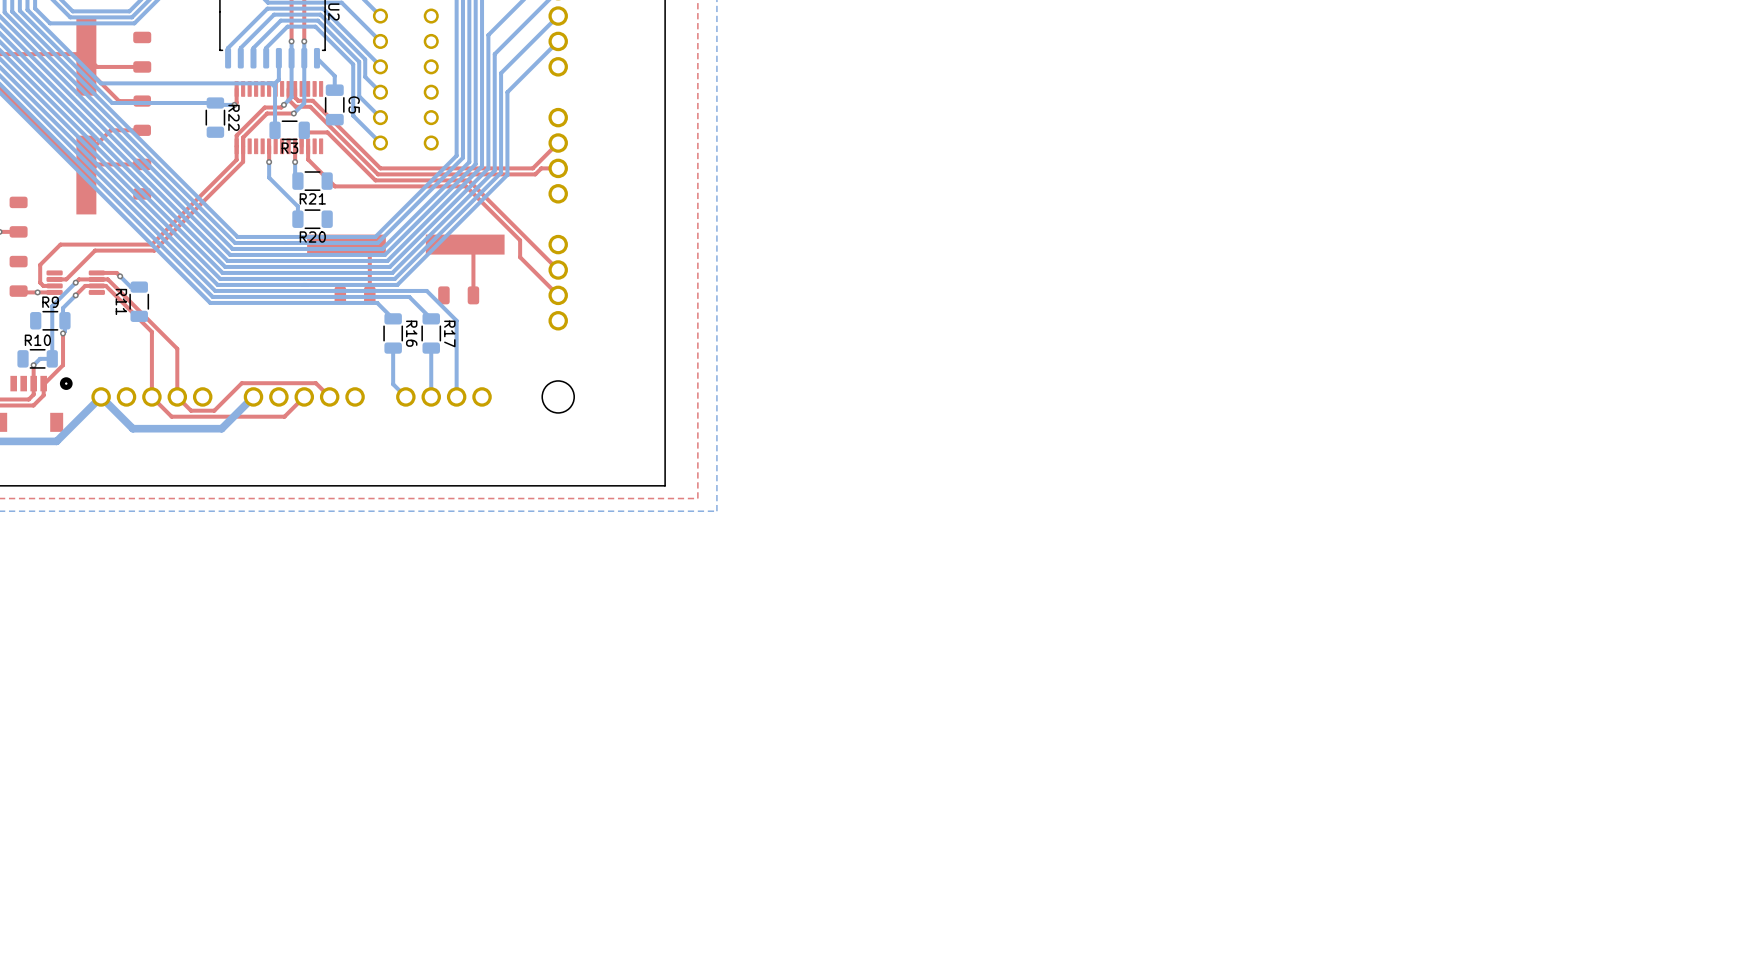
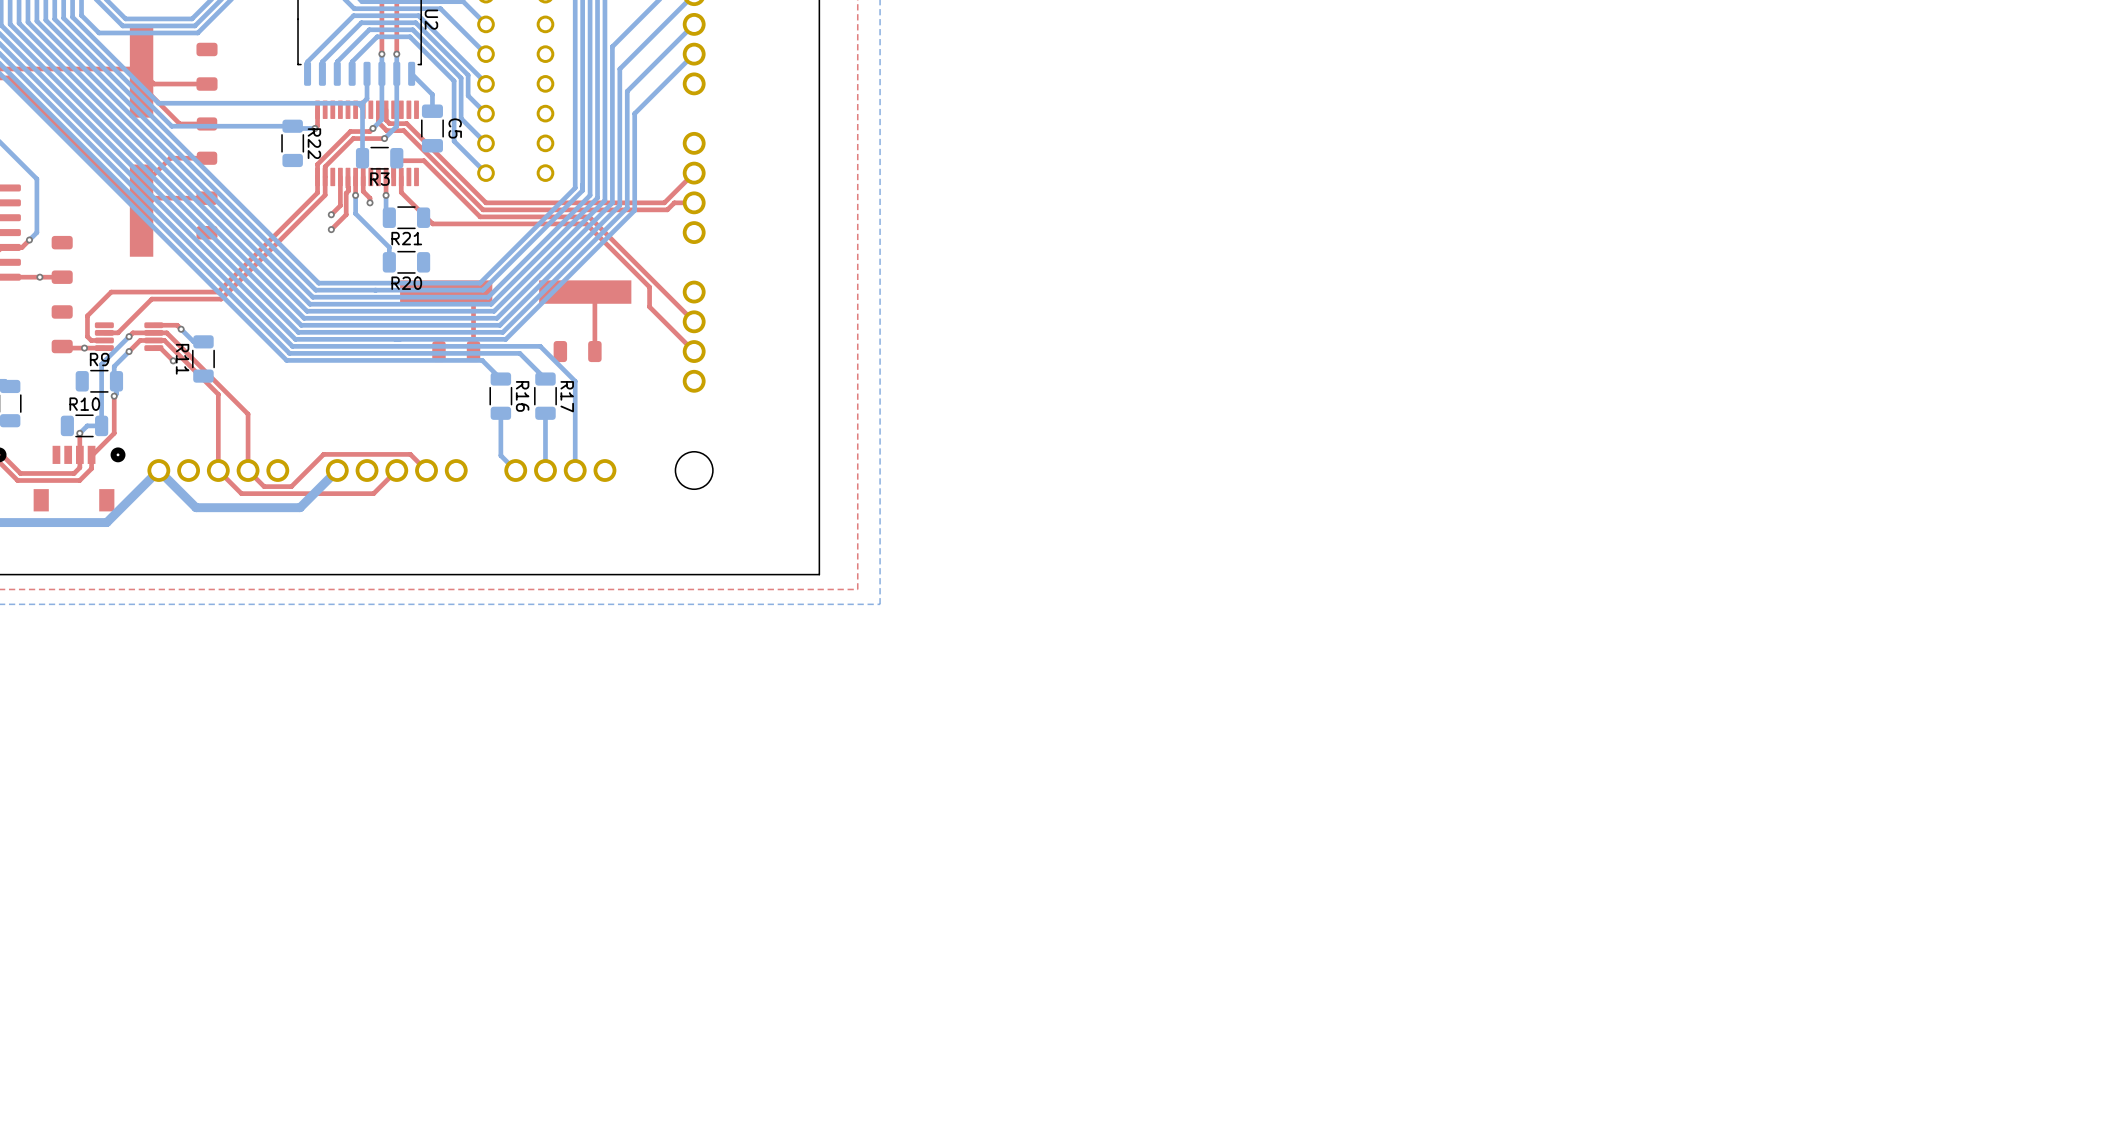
top track: none -> (340, 176) (340, 205) (331, 214)
top track: none -> (348, 176) (346, 214) (331, 229)
top track: none -> (363, 176) (363, 191) (370, 198) (370, 202)
via: none -> (370, 202)
via: none -> (331, 214)
via: none -> (331, 229)
top track: none -> (153, 348) (160, 348) (173, 360)
via: none -> (173, 360)

